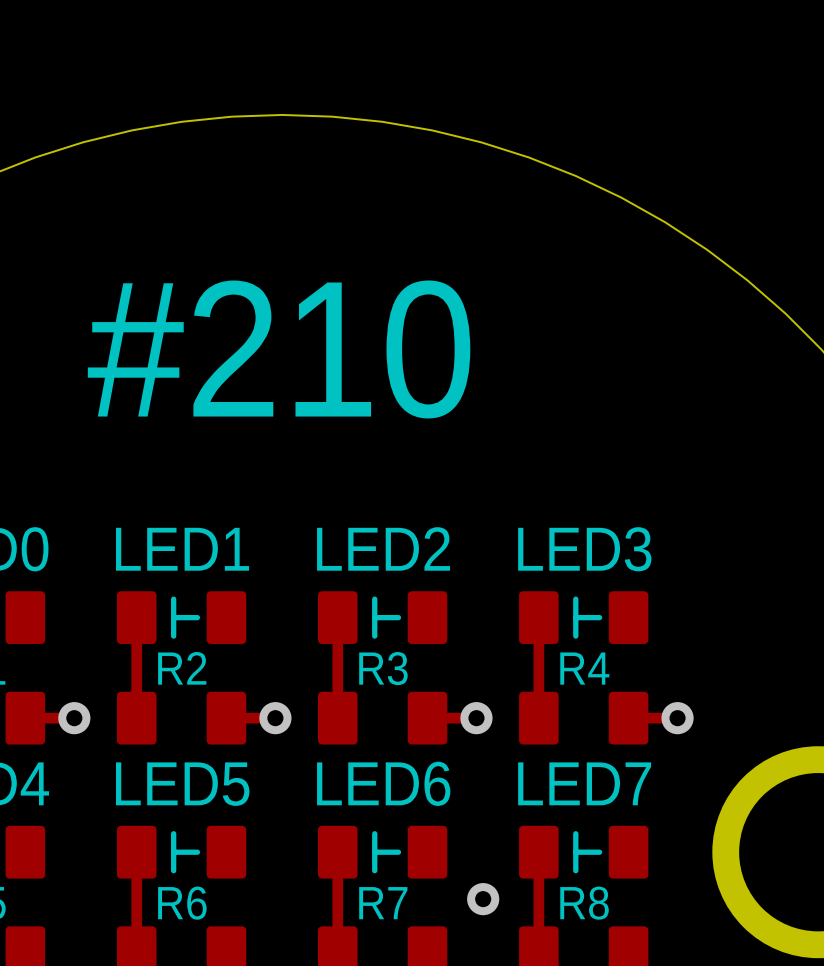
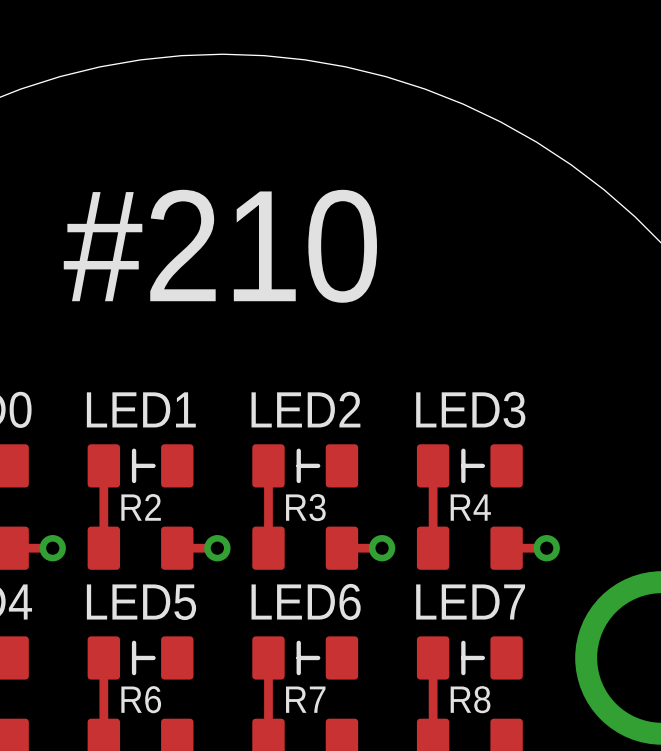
via: (483, 899) -> none

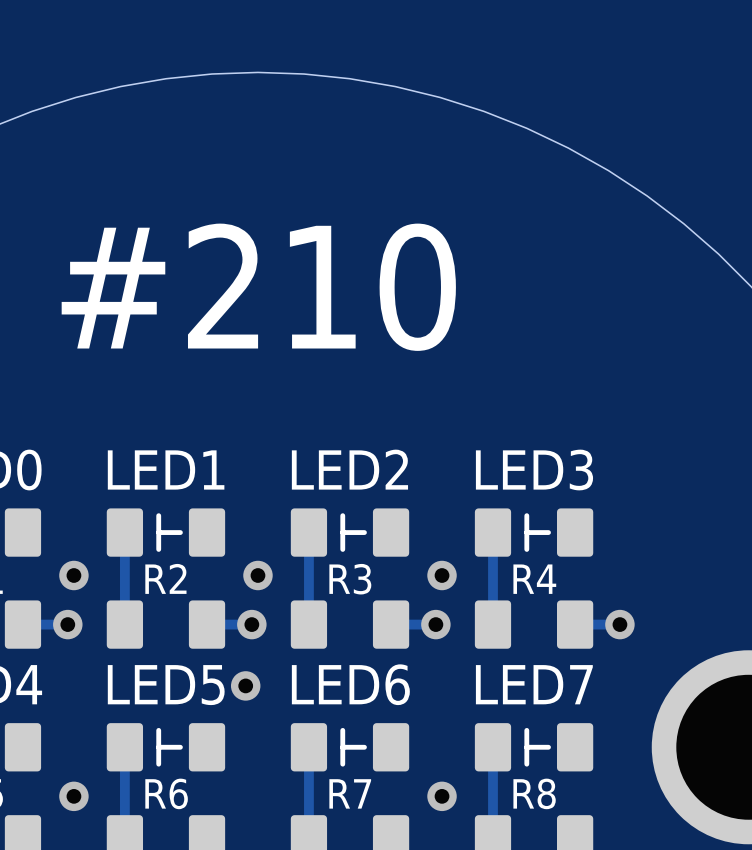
via: none -> (73, 575)
via: none -> (257, 575)
via: none -> (442, 575)
via: none -> (245, 685)
via: none -> (73, 796)
via: none -> (442, 796)

